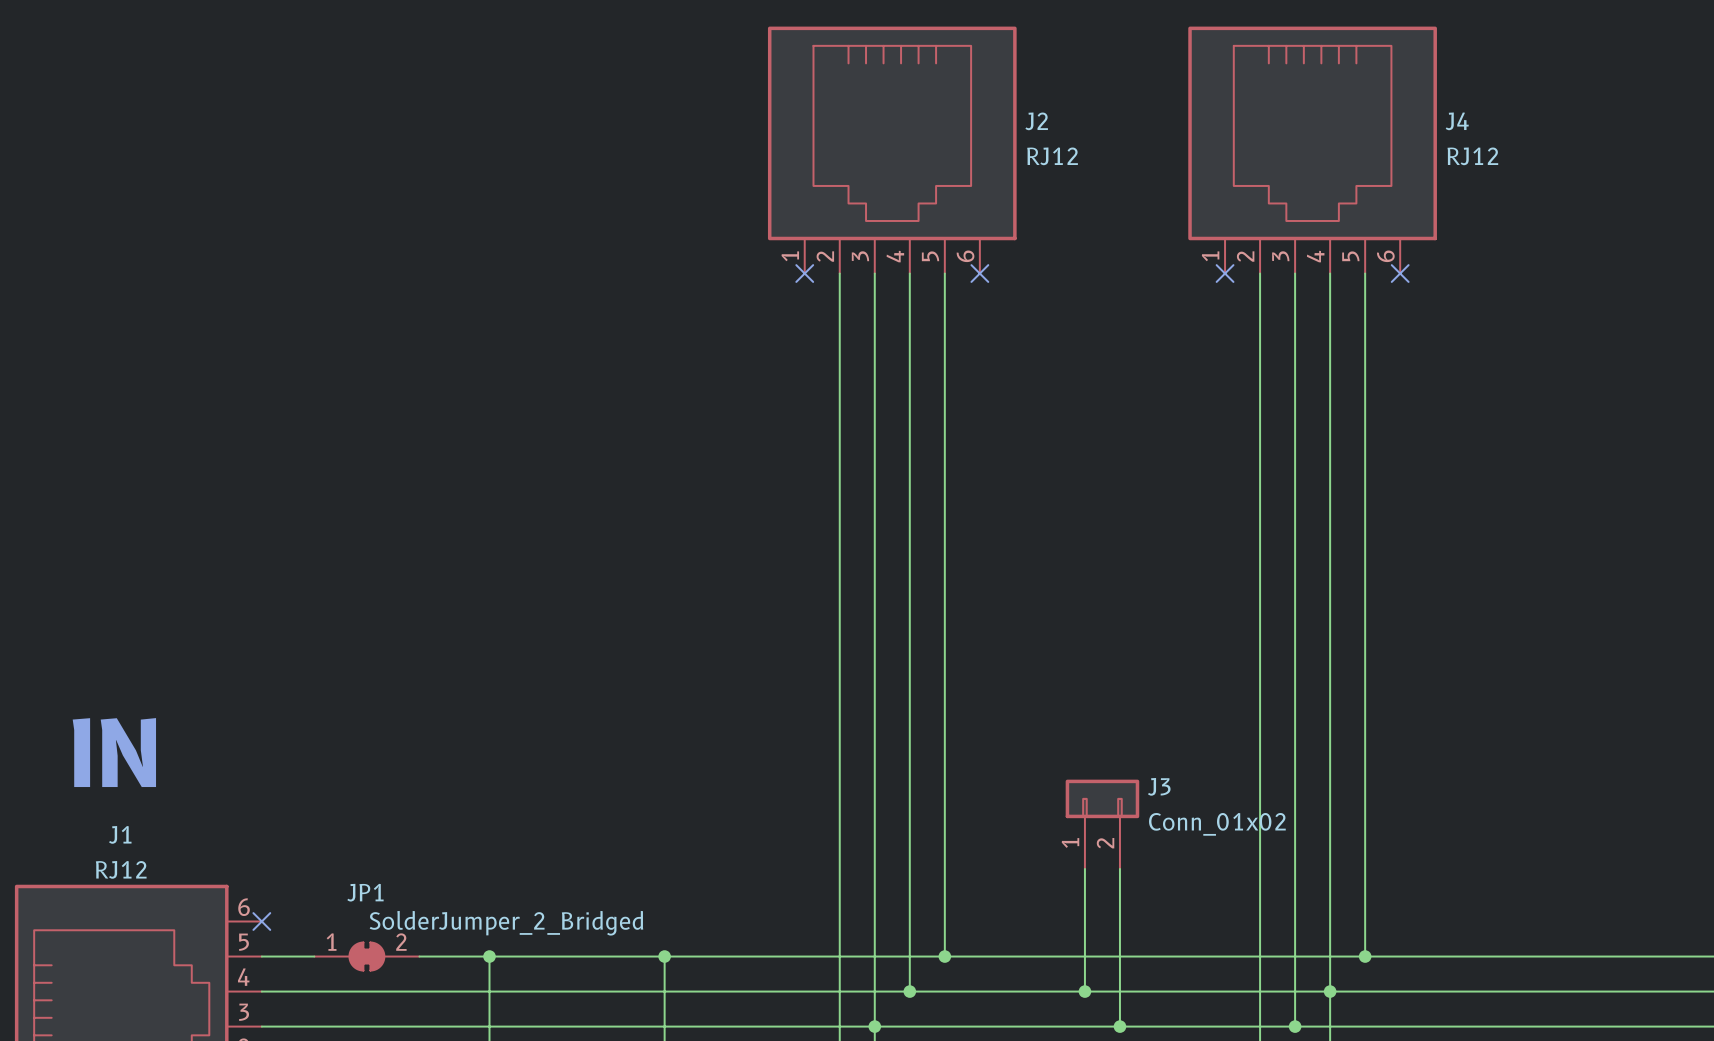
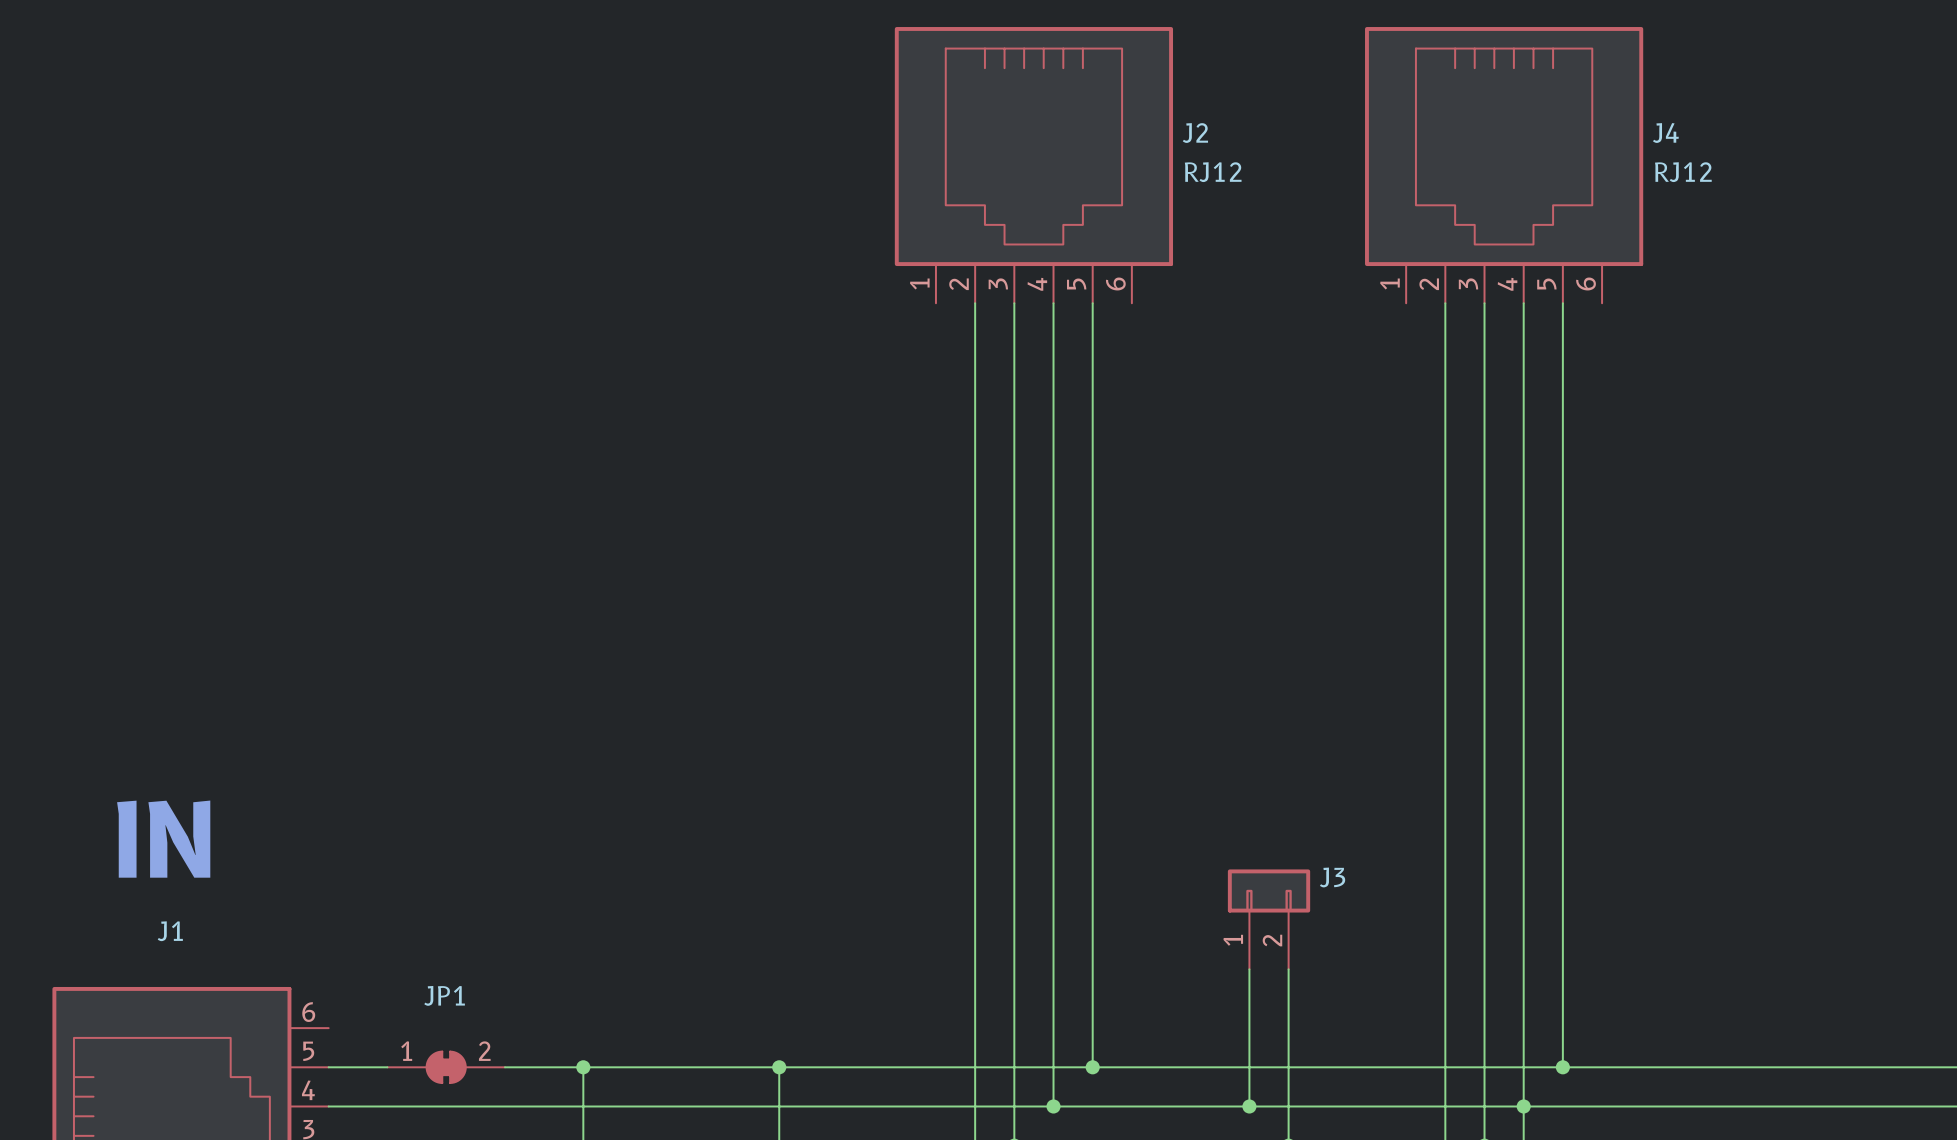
no-connect mark: (804, 273) -> none
no-connect mark: (979, 273) -> none
no-connect mark: (1225, 273) -> none
no-connect mark: (1400, 273) -> none
J3 value: Conn_01x02 (1217, 824) -> none
J1 value: RJ12 (121, 869) -> none
no-connect mark: (261, 921) -> none
JP1 value: SolderJumper_2_Bridged (506, 923) -> none

